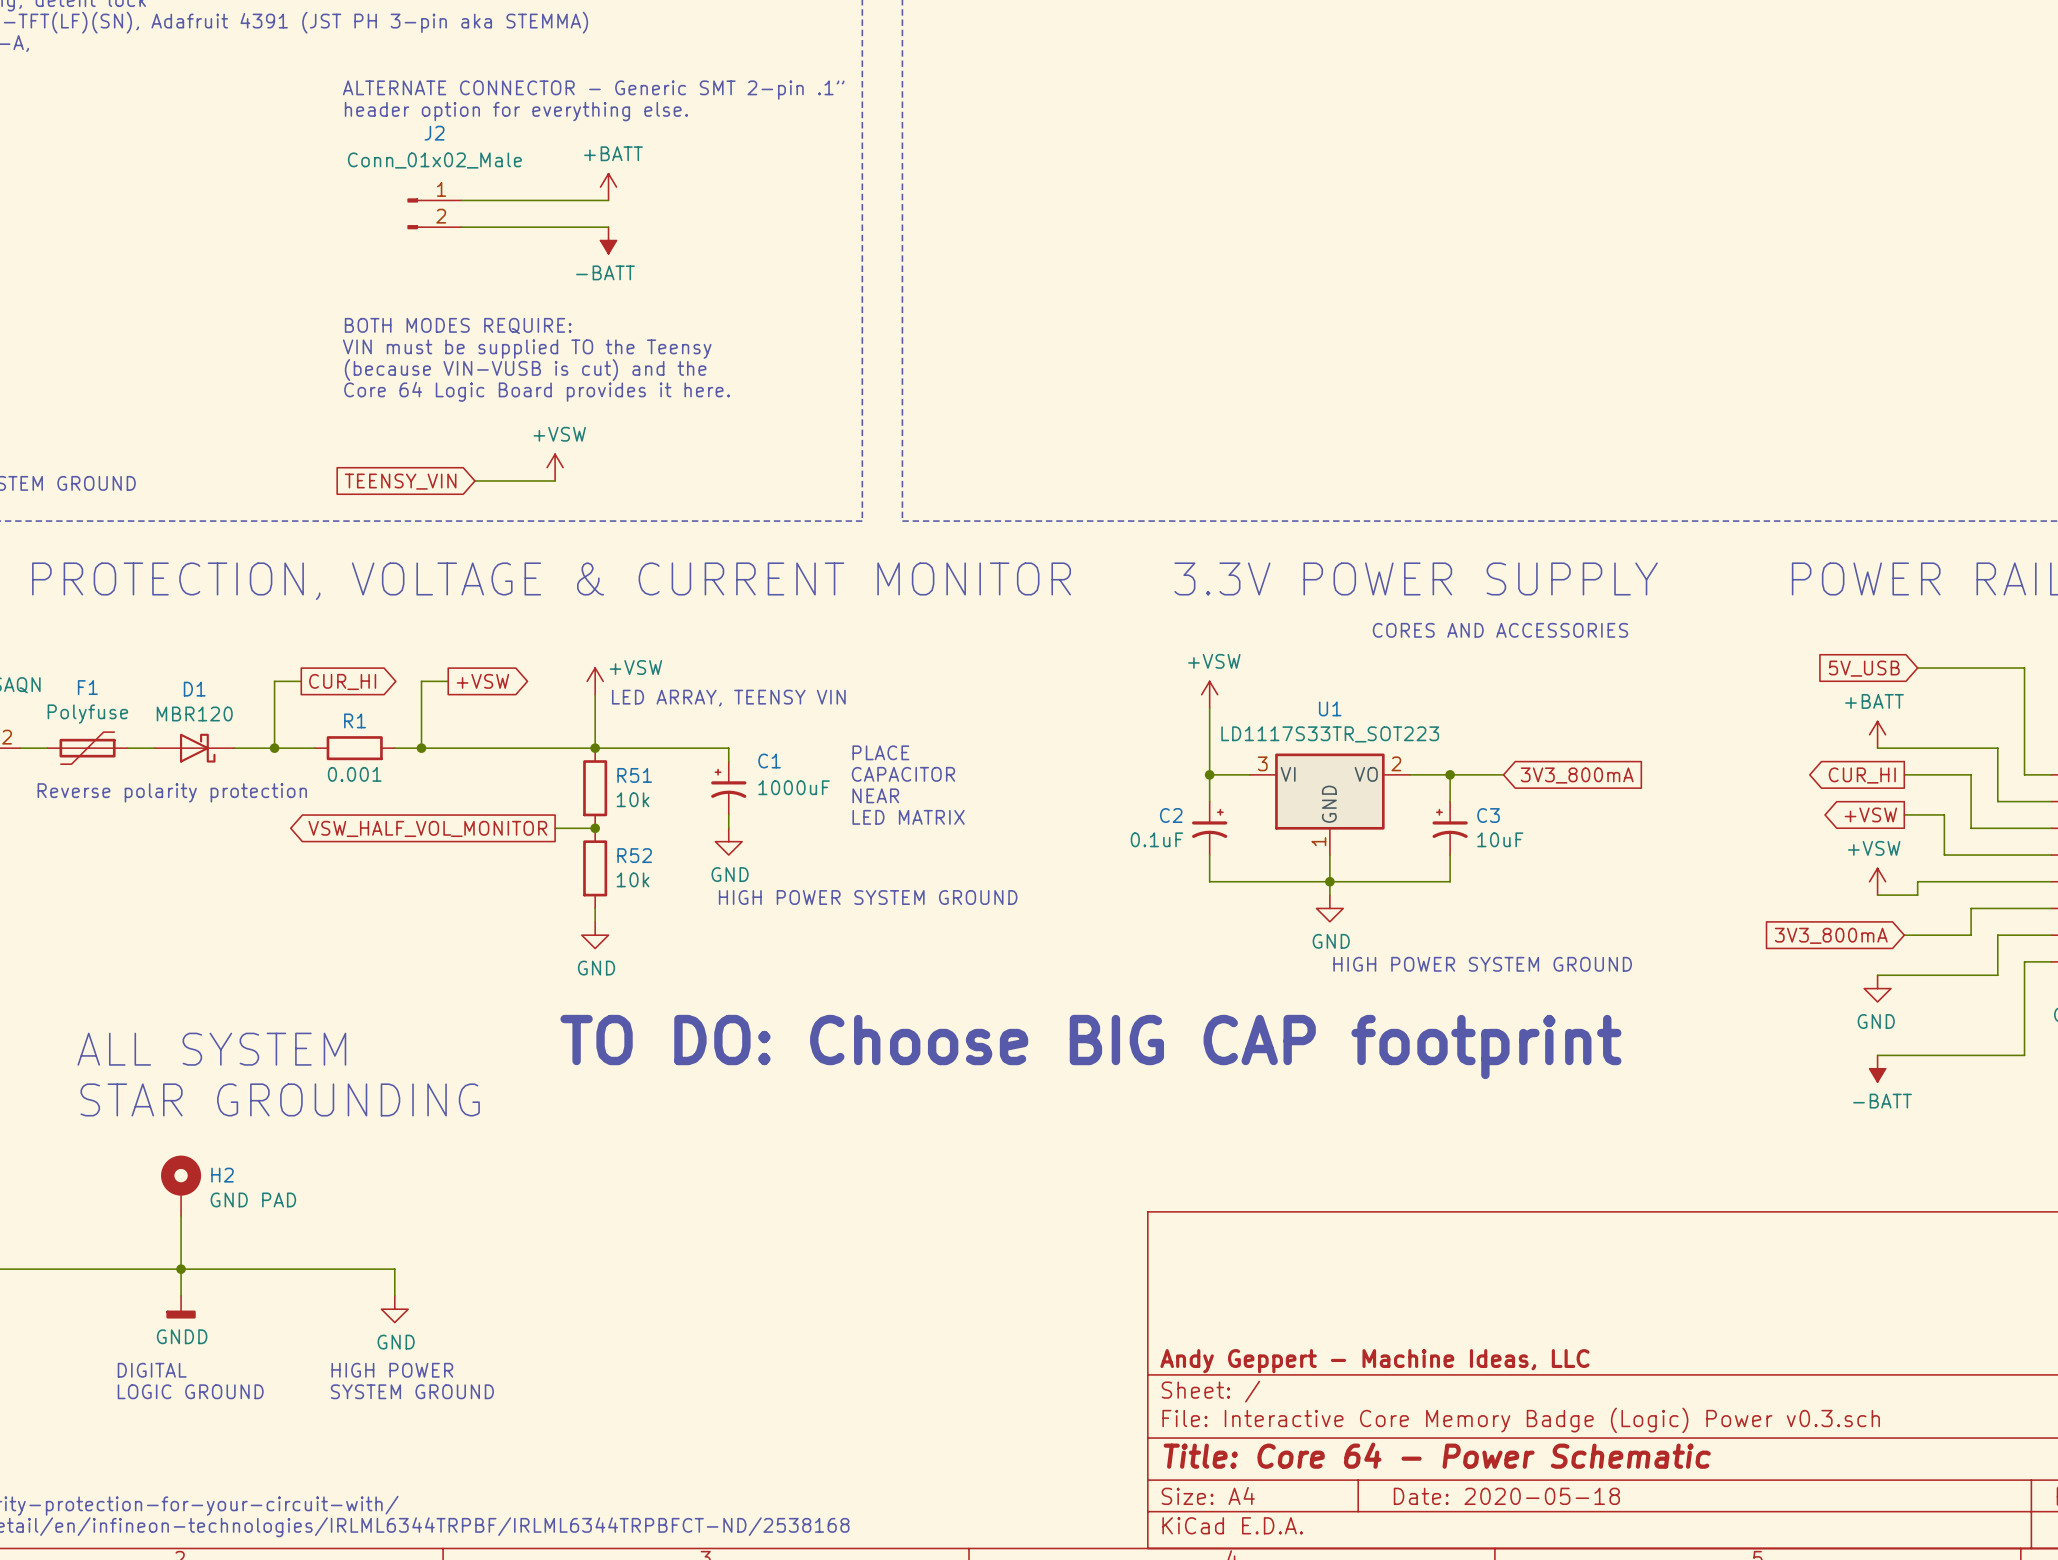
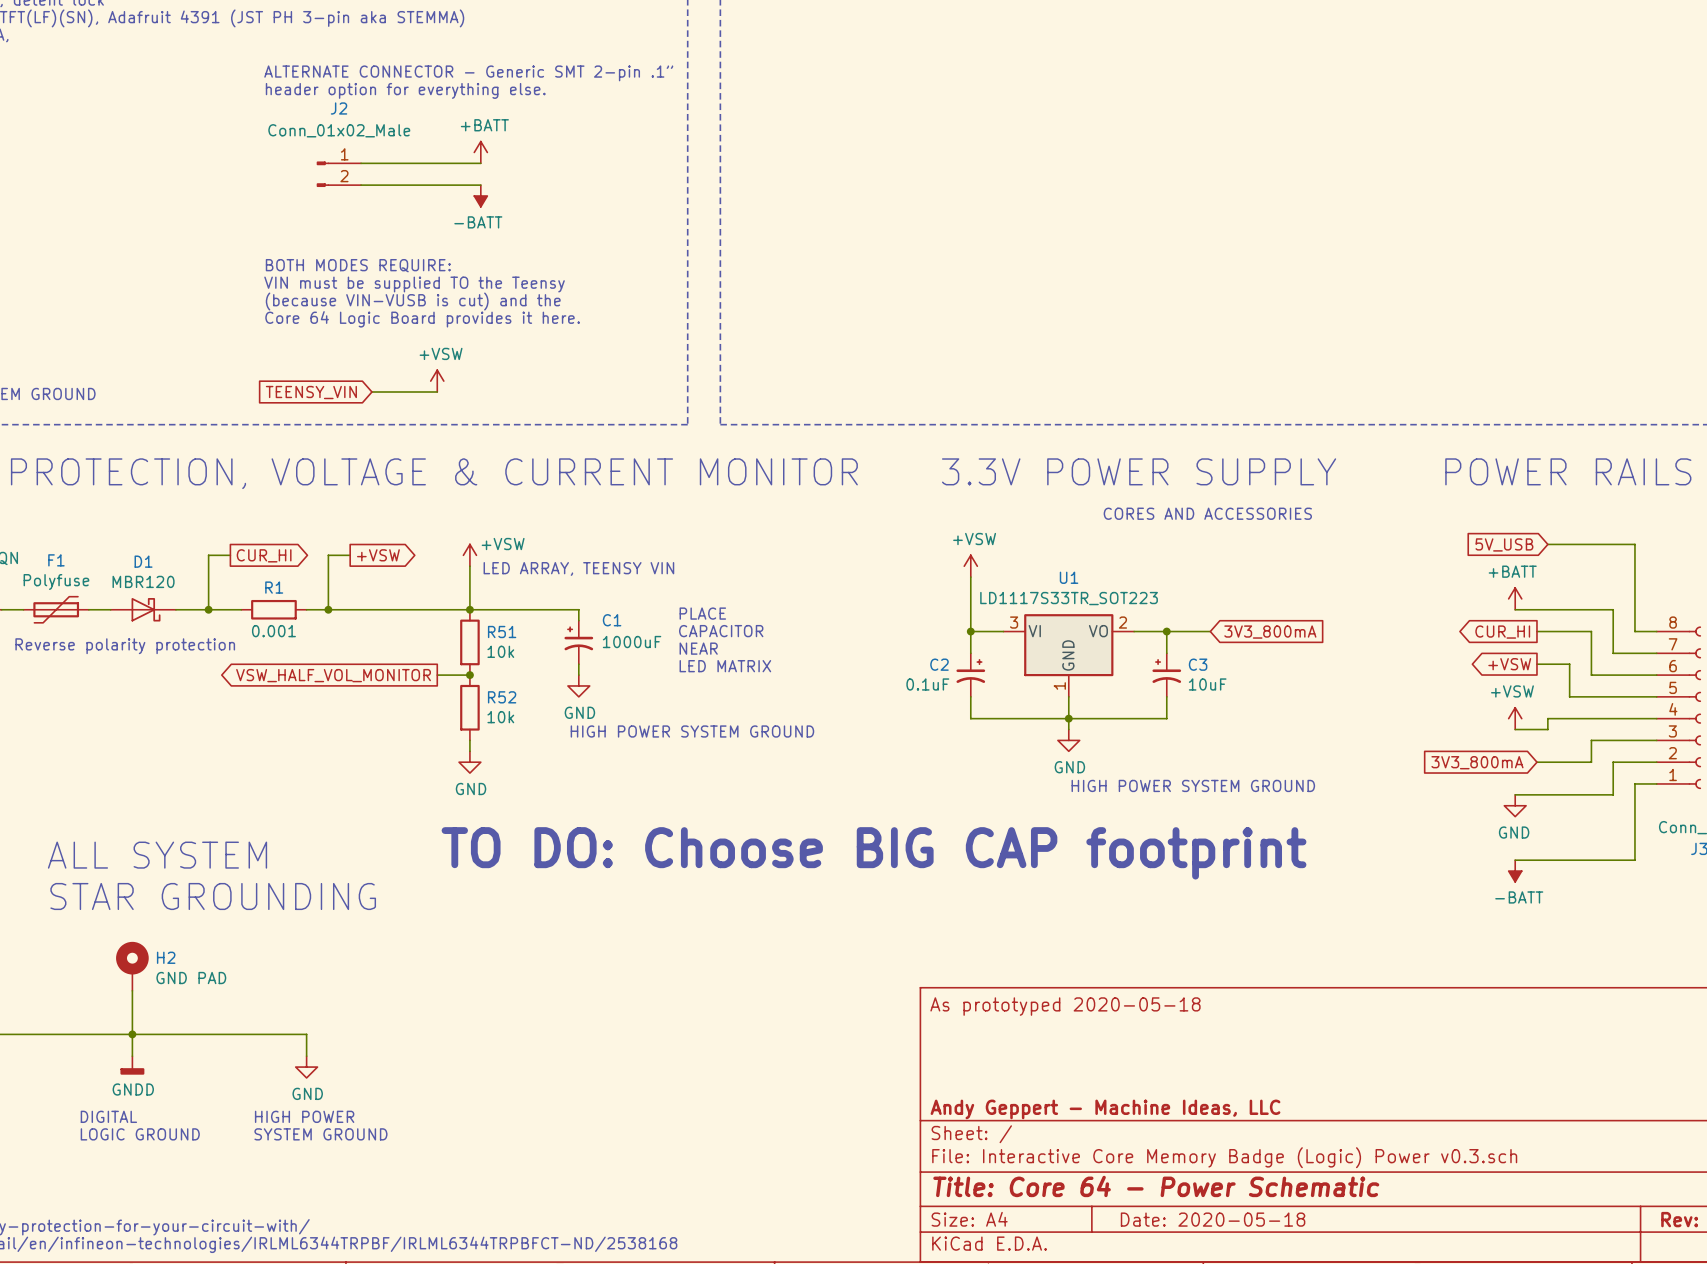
title block: none -> As prototyped 2020-05-18 (1065, 1006)

